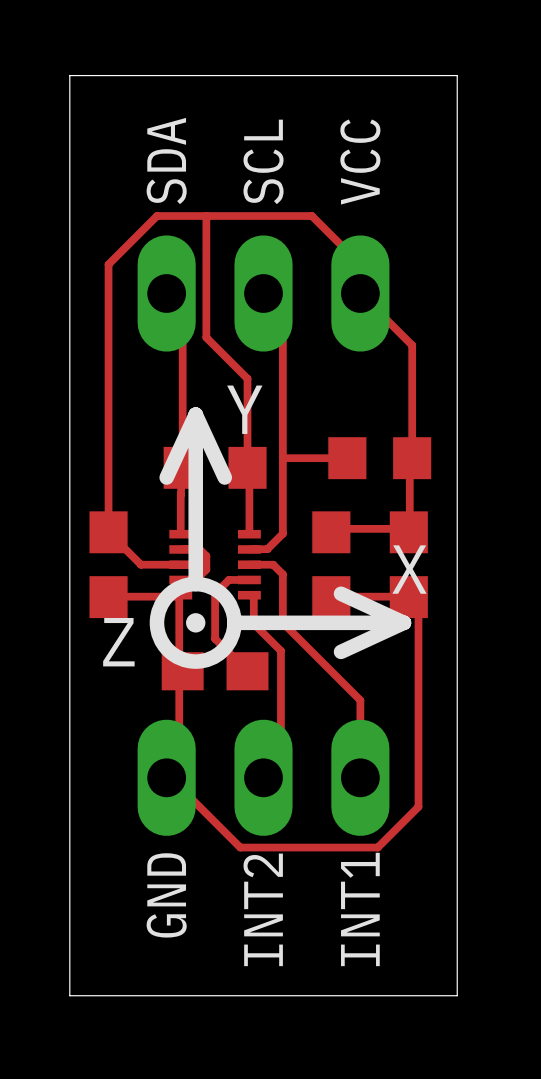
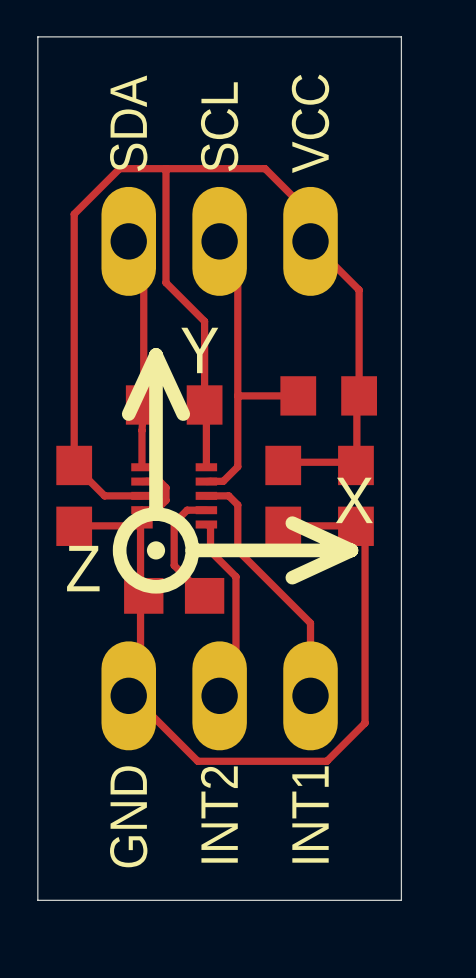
text position: SDA (166, 161) -> SDA (128, 123)
text position: SCL (263, 161) -> SCL (219, 126)
text position: VCC (360, 162) -> VCC (310, 123)

